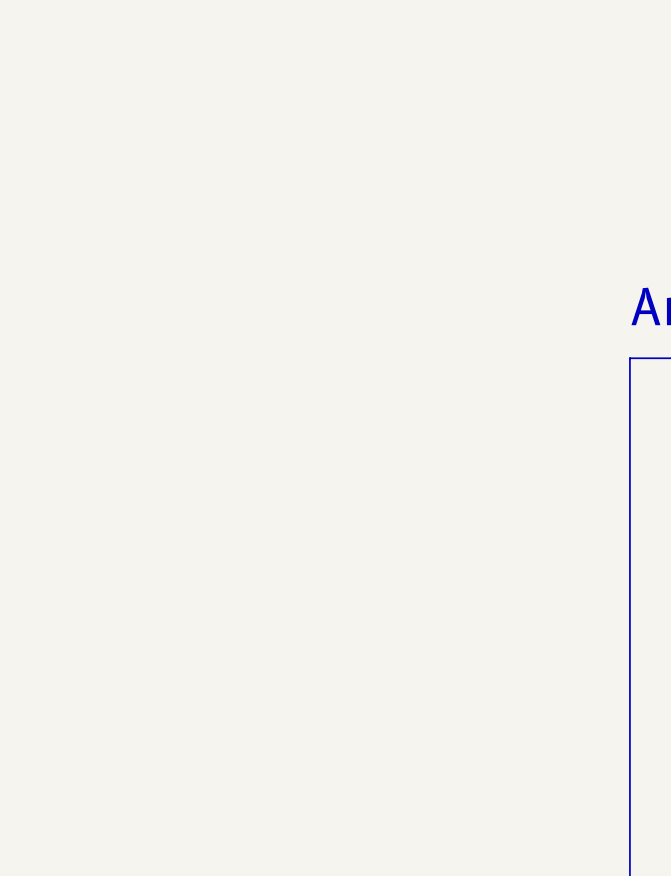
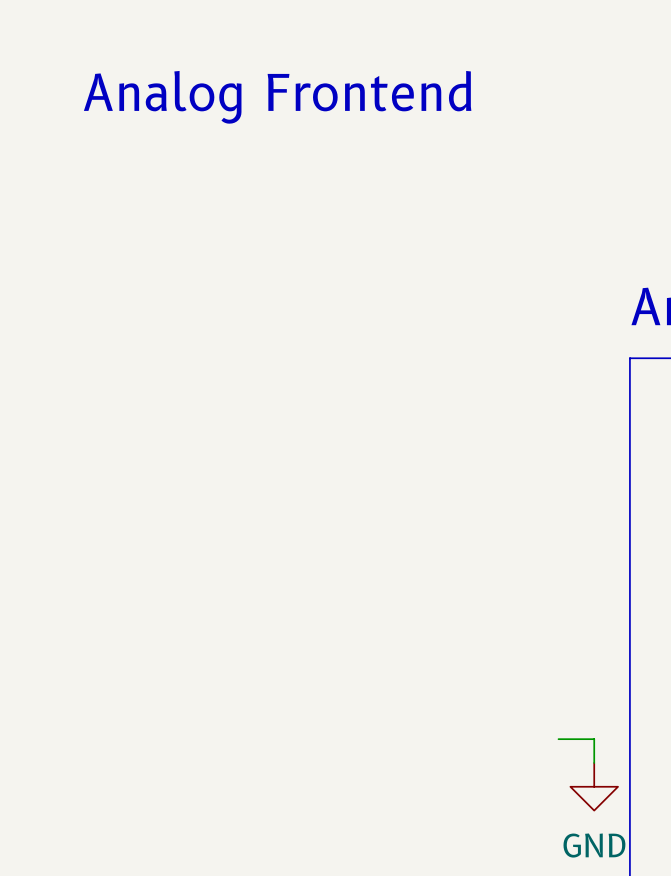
text: none -> Analog Frontend (277, 97)
wire: none -> (558, 739) (594, 739) (594, 762)
power symbol: none -> GND (594, 786)

